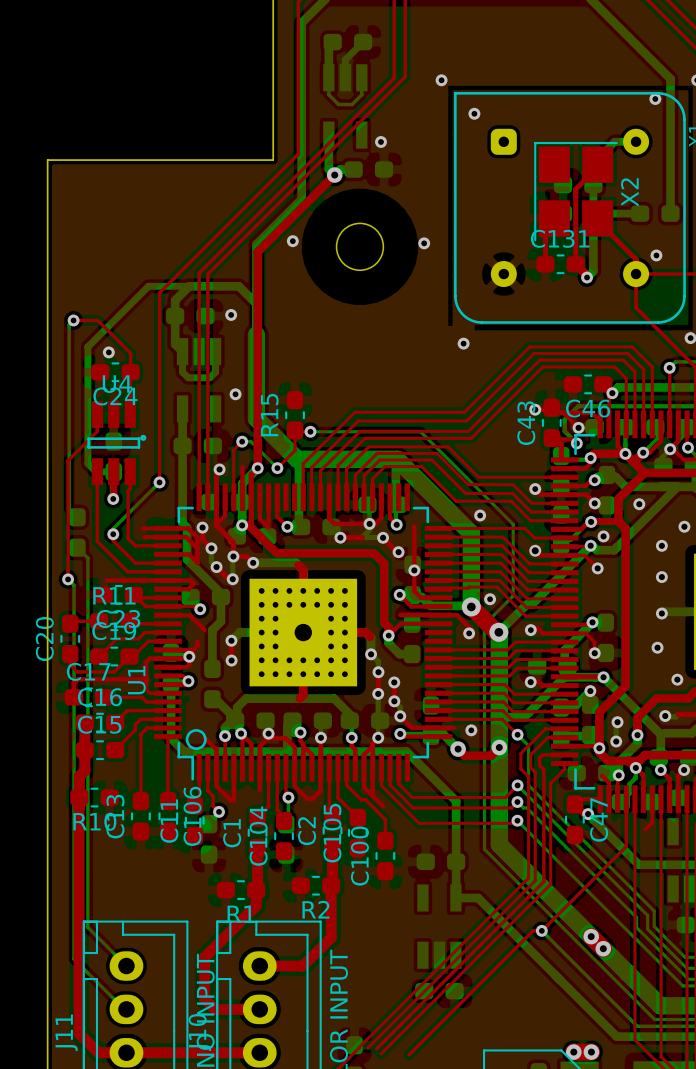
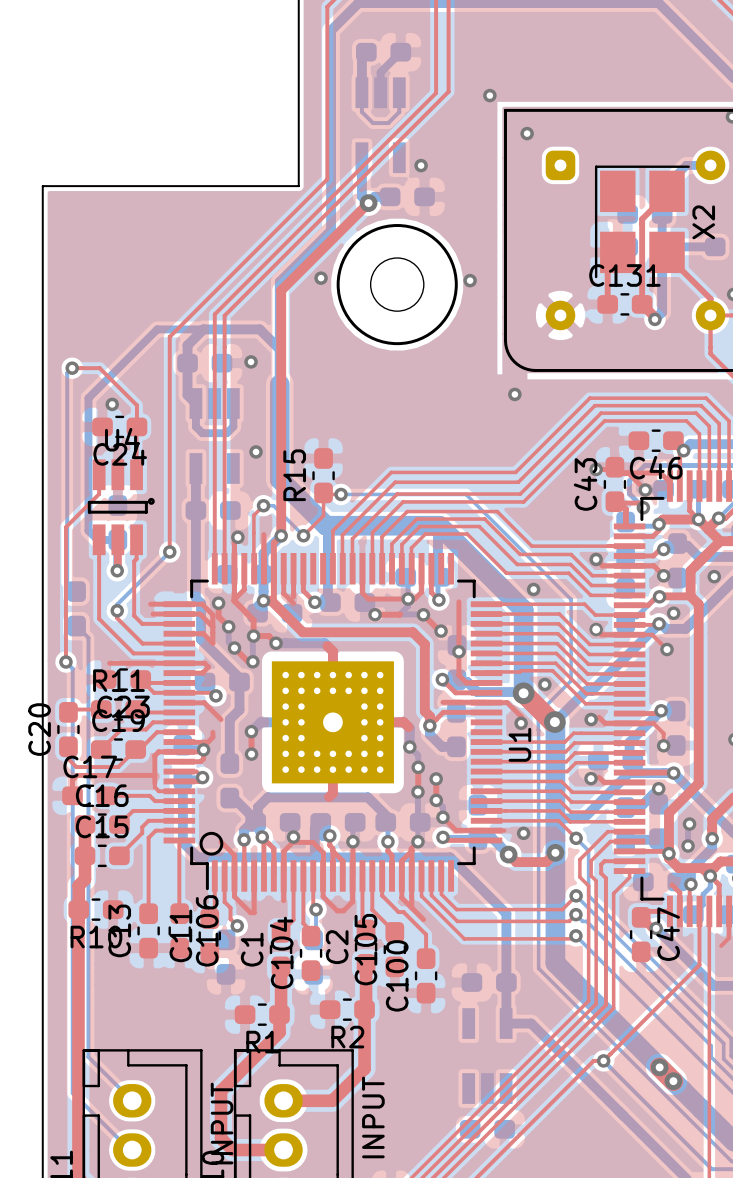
drawing: none -> [336, 224, 458, 346]
U1 name position: U1 (136, 680) -> U1 (519, 744)

